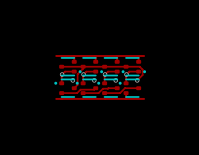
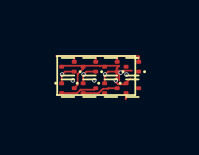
line: none -> (57, 55) (135, 55) (135, 95) (57, 95) (57, 55)
track: (136, 55) (144, 55) -> none
track: none -> (60, 65) (119, 65) (116, 68) (116, 82) (124, 84) (130, 78)
track: (61, 66) (139, 66) (142, 69) (142, 75) (137, 80) -> none
track: none -> (131, 70) (122, 70) (119, 74) (119, 80)
track: (138, 71) (129, 71) (126, 74) (126, 83) -> none
via position: (137, 80) -> (120, 72)
track: (138, 88) (124, 88) (120, 93) (104, 93) -> none
track: (56, 98) (144, 98) -> none

